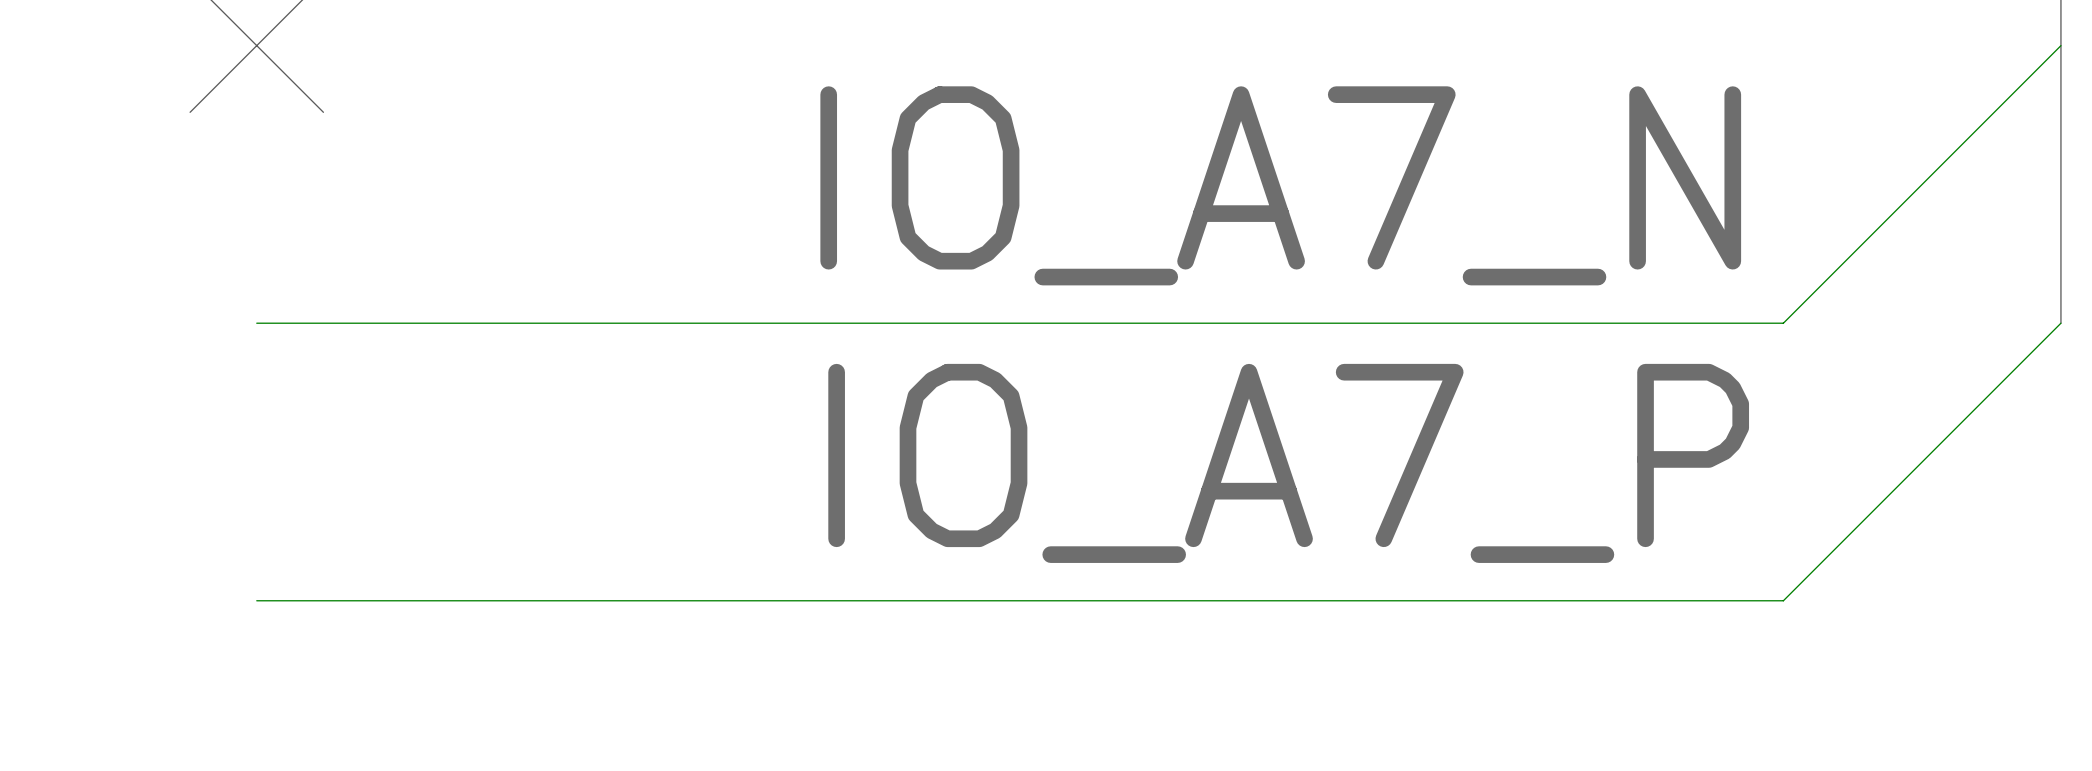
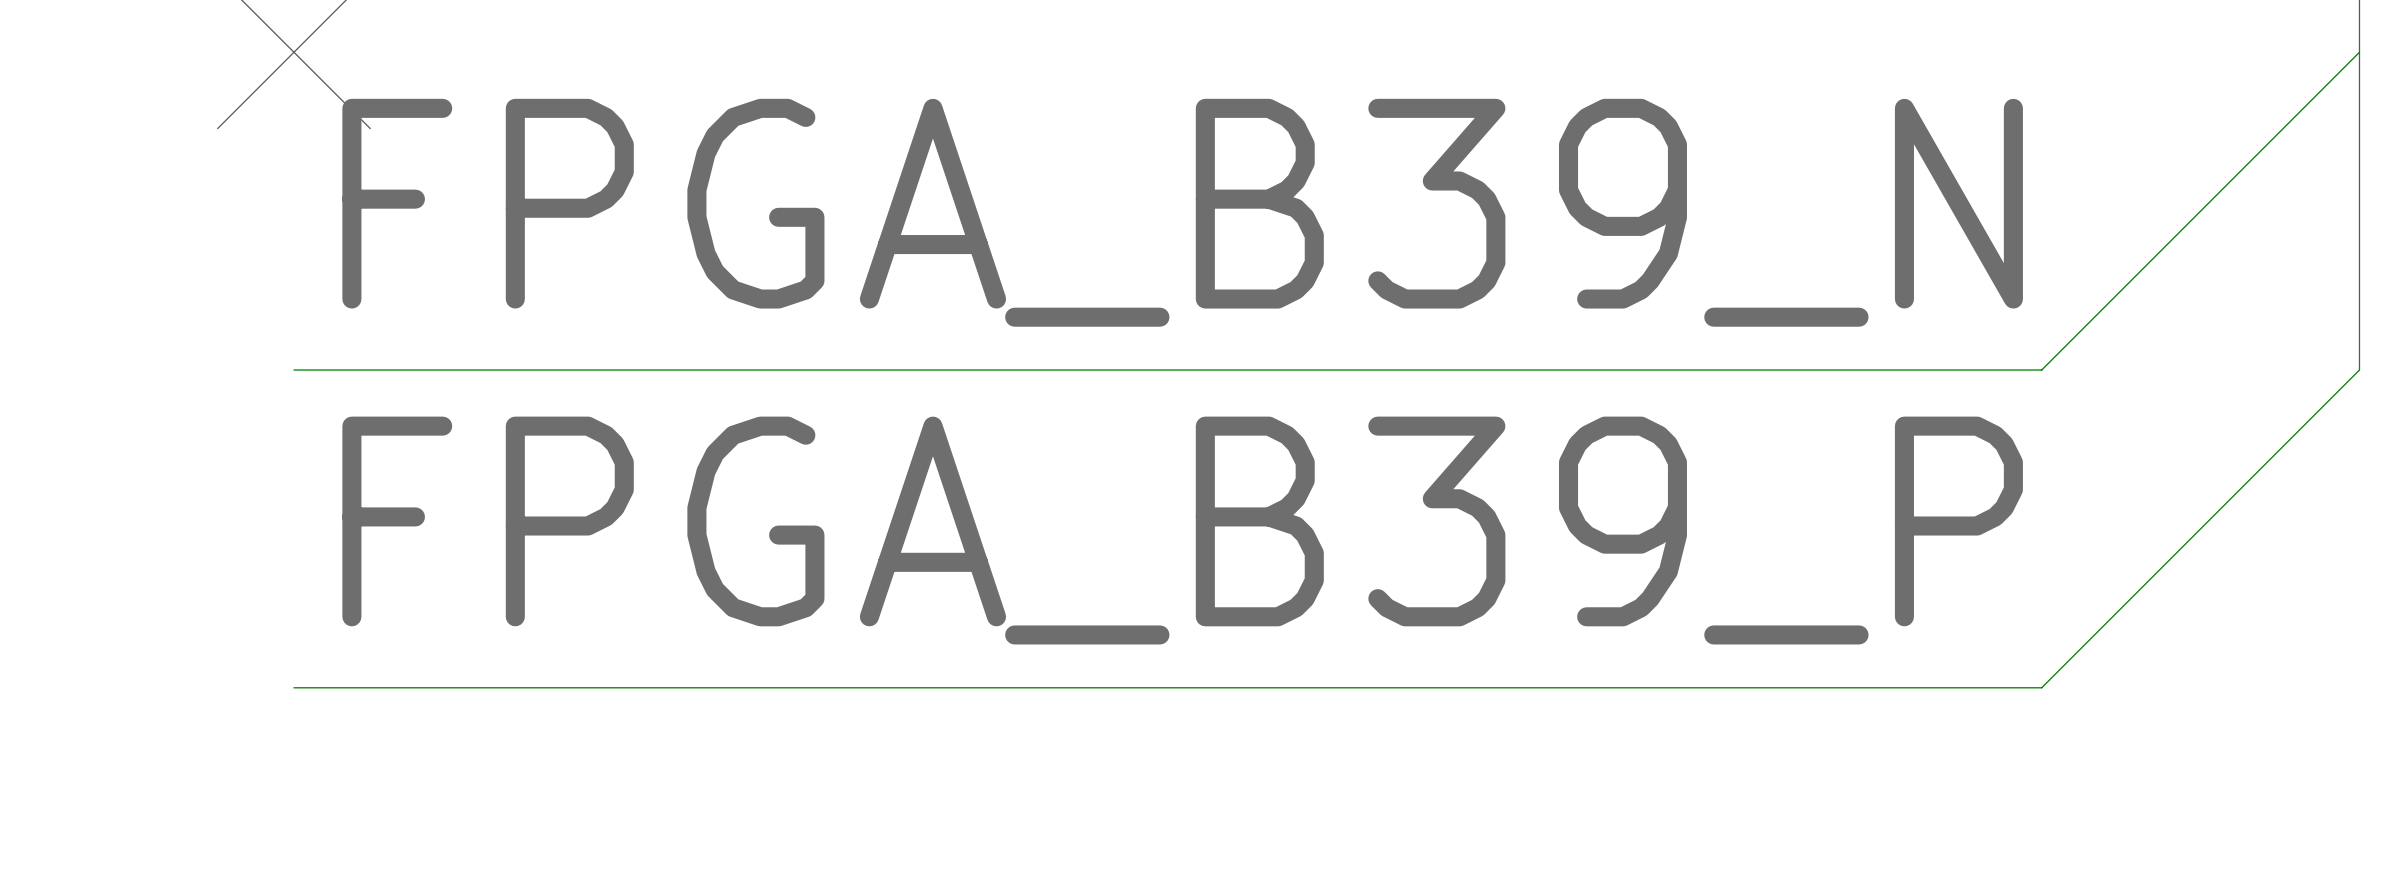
label: none -> FPGA_B39_N (1182, 212)
label: IO_A7_N (1280, 185) -> none
label: none -> FPGA_B39_P (1182, 530)
label: IO_A7_P (1288, 463) -> none

